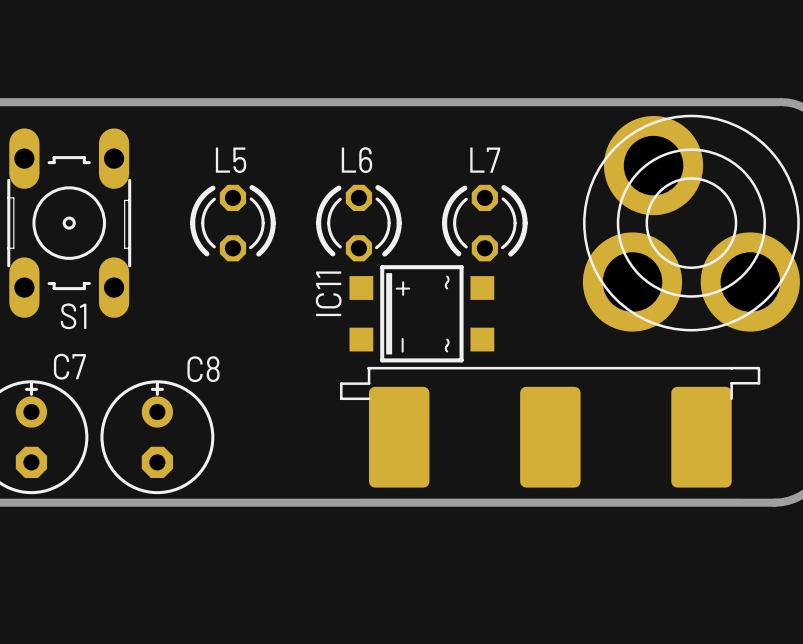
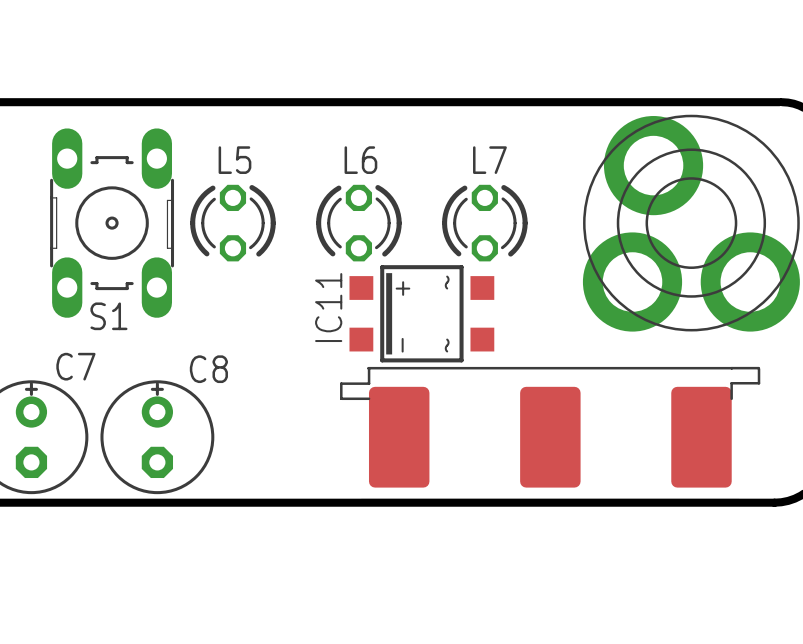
S1 position: (69, 223) -> (112, 223)

